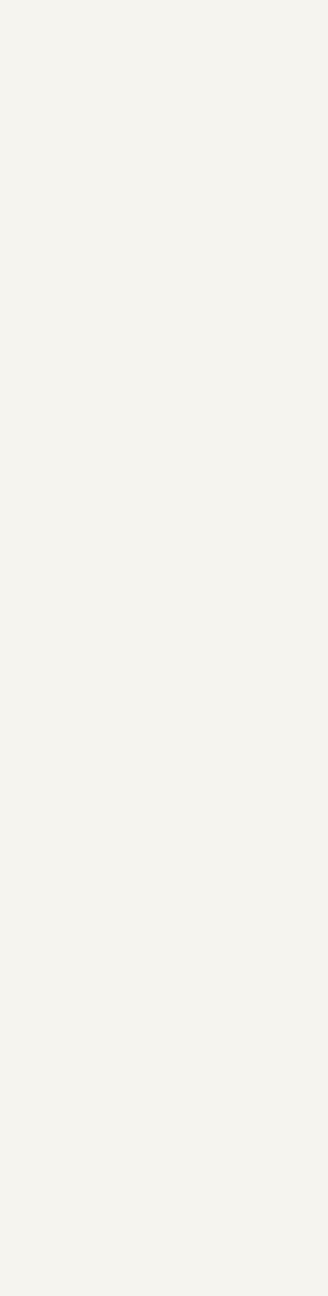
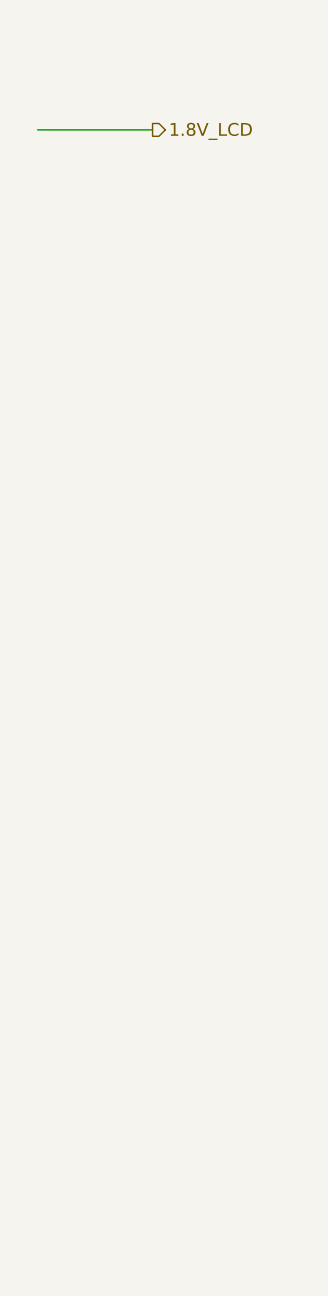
wire: none -> (37, 129) (152, 129)
hierarchical label: none -> 1.8V_LCD (211, 131)

